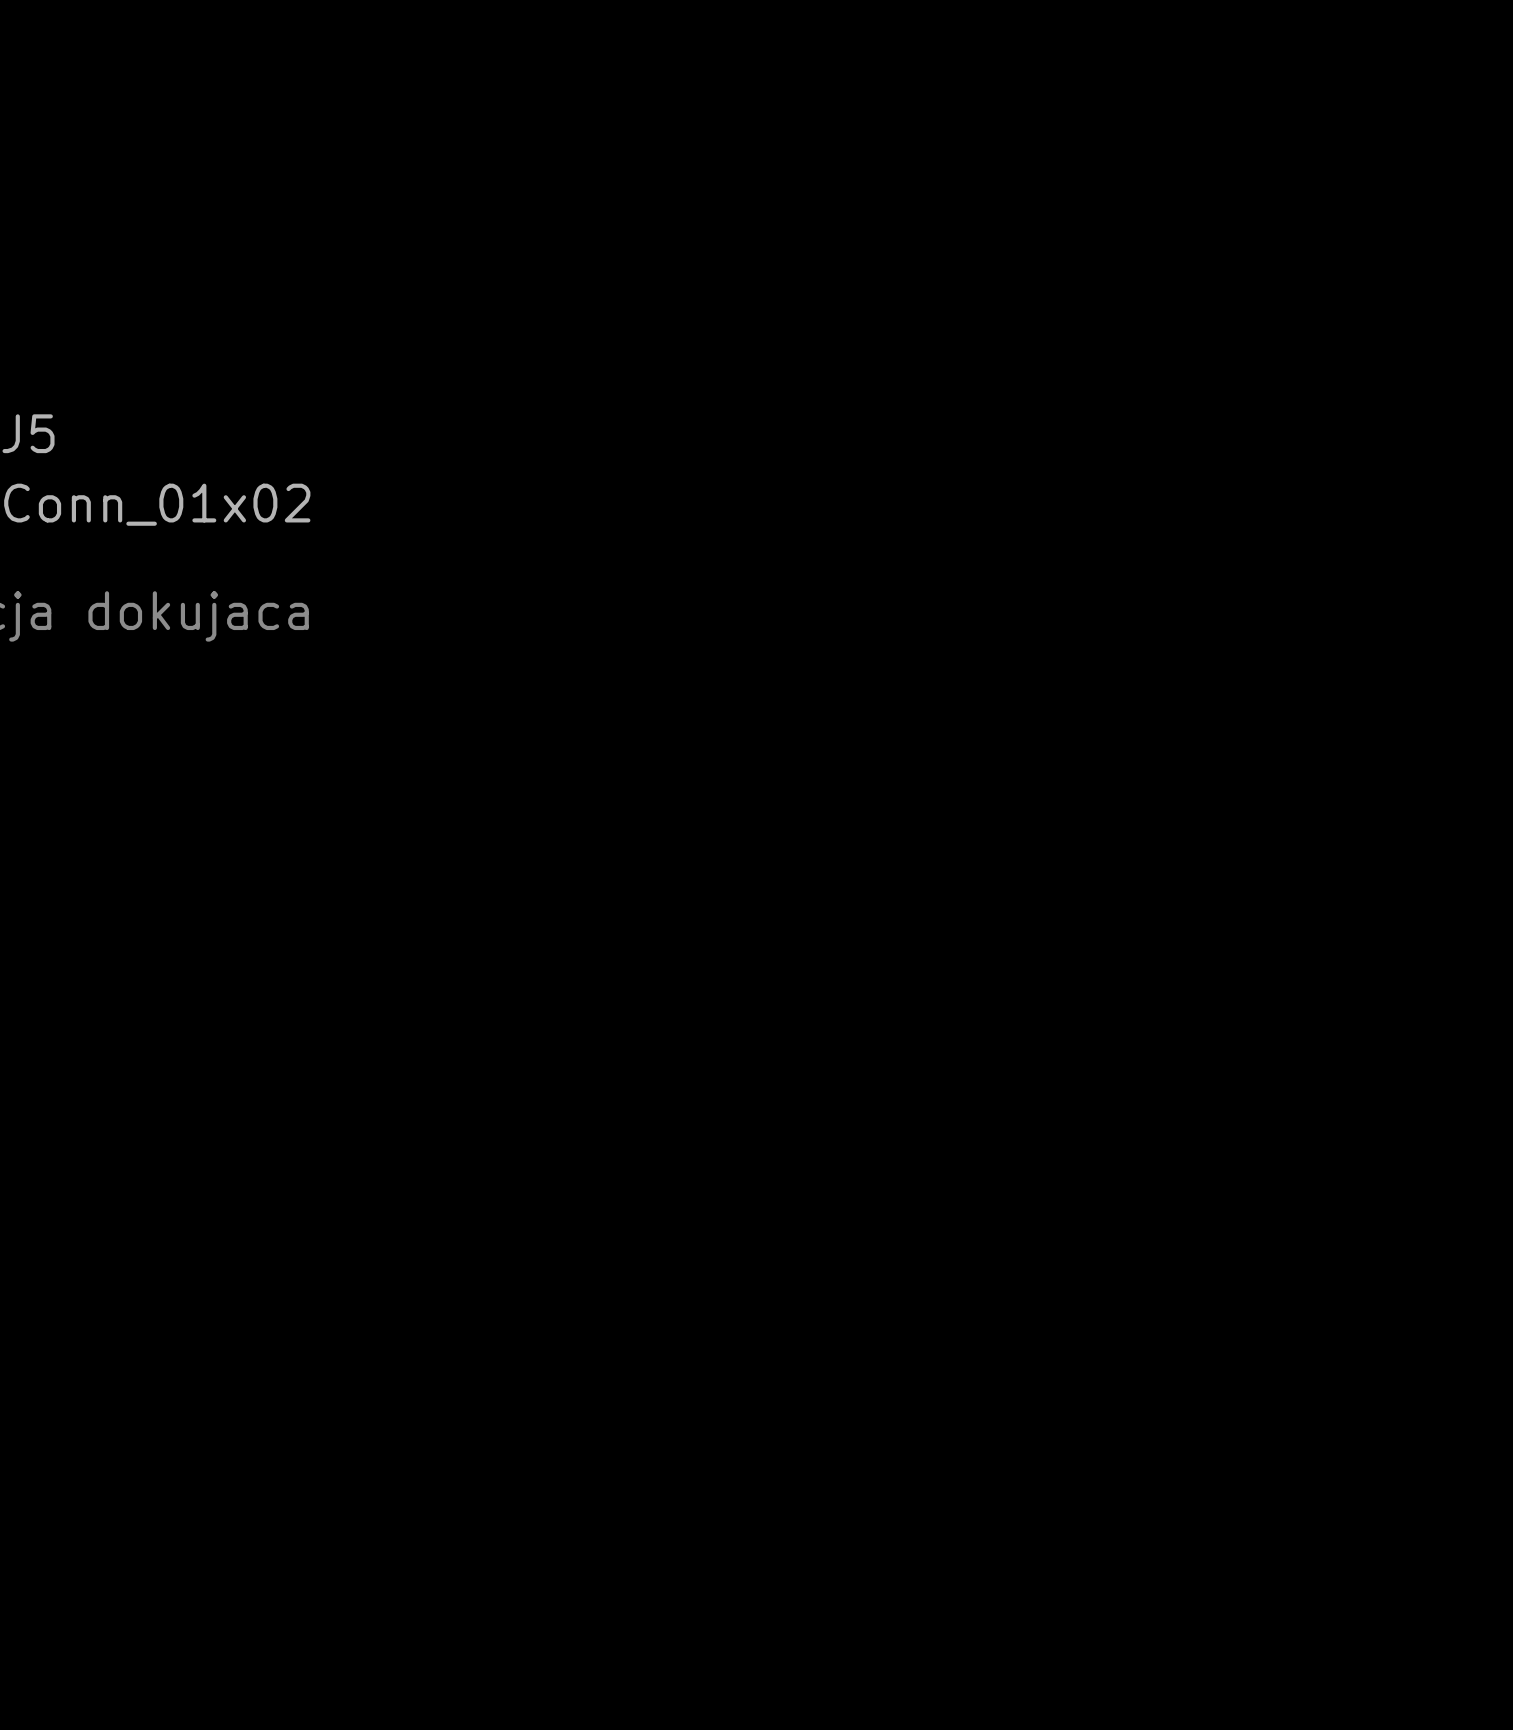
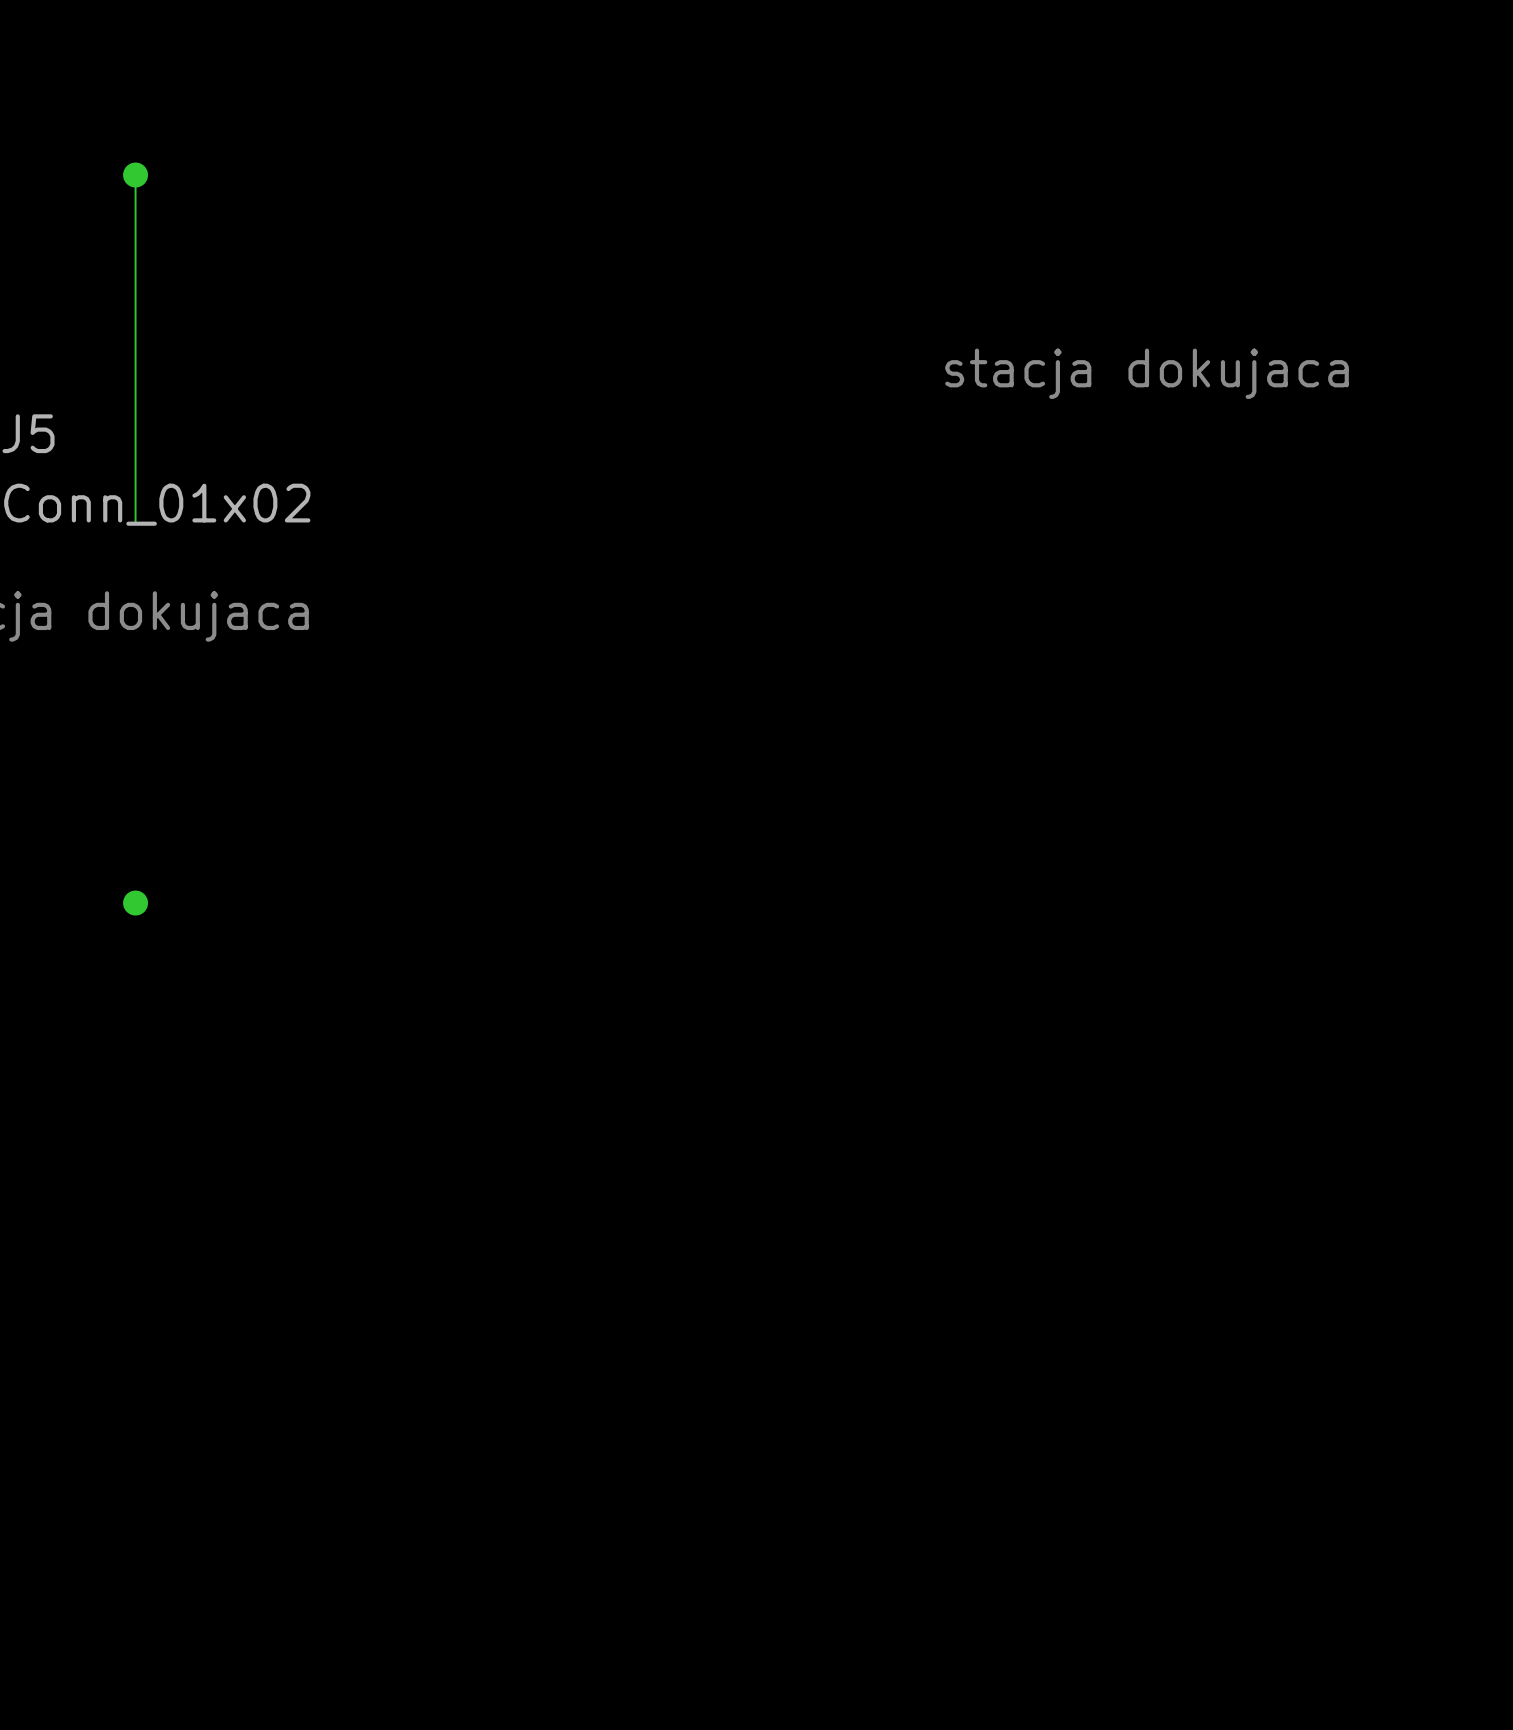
wire: none -> (135, 175) (135, 521)
junction: none -> (135, 175)
text: none -> stacja dokujaca (1147, 373)
junction: none -> (135, 903)

